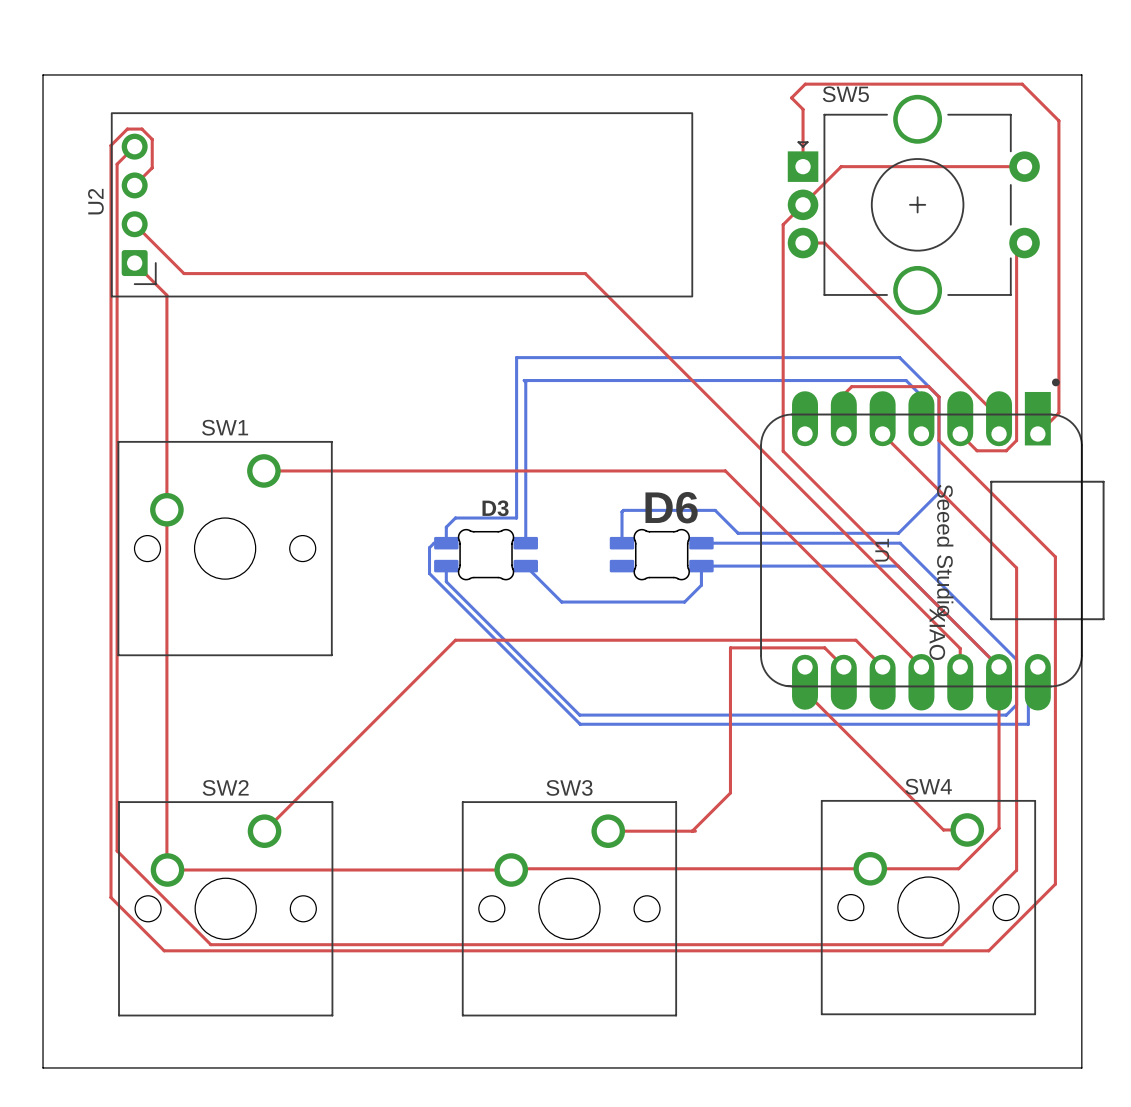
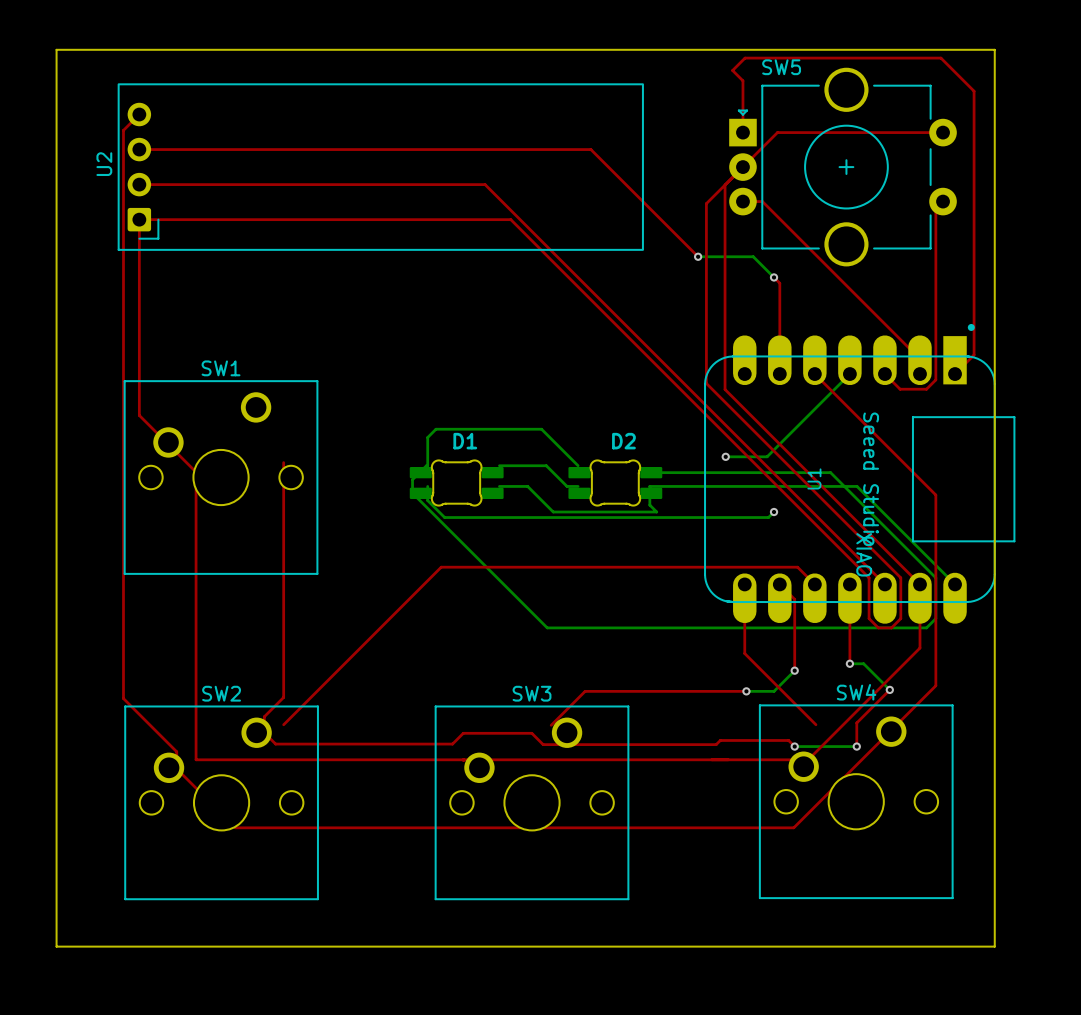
top track: (134, 185) (152, 167) (152, 139) (141, 129) (127, 129) (110, 145) (110, 897) (164, 950) (988, 950) (1055, 884) (1055, 556) (939, 440) (939, 396) (928, 386) (851, 386) (843, 394) -> (139, 149) (590, 149) (698, 256)
top track: (134, 224) (184, 273) (585, 273) (960, 648) (960, 666) -> (139, 184) (485, 184) (884, 584)
top track: (134, 263) (166, 295) (167, 869) (958, 868) (999, 828) (999, 737) -> (725, 185) (706, 203) (706, 383) (900, 577) (900, 618) (891, 627) (878, 627) (869, 618) (869, 577) (510, 219) (139, 219) (139, 415) (201, 477) (196, 482) (196, 759) (808, 759) (919, 648)
bottom track: none -> (698, 256) (753, 256) (774, 277)
via: none -> (698, 256)
top track: none -> (774, 277) (779, 283) (779, 338)
via: none -> (774, 277)
bottom track: (921, 395) (906, 380) (524, 380) (525, 382) (525, 543) -> none
bottom track: none -> (849, 374) (767, 456) (725, 456)
top track: (263, 470) (725, 470) (921, 666) -> (849, 663) (849, 584)
D6 name: D6 (671, 507) -> D2 (623, 441)
D3 name: D3 (495, 508) -> D1 (465, 441)
via: none -> (725, 456)
top track: none -> (283, 462) (283, 697) (264, 716) (264, 732) (275, 744) (452, 744) (463, 733) (531, 733) (543, 744) (716, 744) (720, 740) (788, 740) (794, 746)
bottom track: none -> (499, 465) (546, 465) (567, 486) (578, 486)
bottom track: (622, 543) (623, 510) (715, 510) (738, 533) (898, 533) (939, 492) (939, 396) (899, 357) (516, 357) (516, 518) (455, 518) (446, 527) (446, 543) (434, 543) (429, 547) (429, 573) (580, 724) (1028, 724) (1028, 676) -> none
bottom track: none -> (427, 486) (427, 500) (444, 517) (768, 517) (774, 512)
bottom track: none -> (499, 486) (527, 486) (553, 512) (656, 512) (649, 505) (649, 486) (857, 486) (955, 584)
bottom track: (446, 566) (446, 581) (579, 715) (586, 715) -> (578, 465) (541, 429) (435, 429) (427, 437) (427, 465) (412, 479) (412, 493) (547, 627)
bottom track: (525, 566) (561, 602) (684, 602) (701, 585) (701, 566) (898, 566) (999, 666) -> none
via: none -> (774, 512)
top track: (730, 647) (730, 793) (692, 831) -> (677, 567) (441, 567) (283, 724)
top track: (824, 647) (843, 666) -> (762, 567) (797, 567)
top track: (863, 647) (855, 640) (455, 640) (264, 831) -> none
top track: none -> (779, 584) (794, 599) (794, 670)
top track: (805, 691) (943, 829) (967, 829) -> (744, 606) (744, 653) (815, 724)
bottom track: none -> (849, 663) (863, 663) (889, 689)
via: none -> (849, 663)
bottom track: none -> (794, 670) (774, 691) (746, 691)
via: none -> (794, 670)
top track: (1016, 779) (1016, 870) (942, 944) (210, 944) (117, 850) (117, 793) -> (935, 685) (793, 827) (235, 827) (176, 768) (176, 751) (123, 698)
top track: none -> (889, 689) (856, 722) (856, 746)
via: none -> (889, 689)
top track: none -> (746, 691) (585, 691) (551, 725)
via: none -> (746, 691)
top track: (608, 831) (695, 831) -> none
bottom track: none -> (794, 746) (856, 746)
via: none -> (794, 746)
via: none -> (856, 746)

